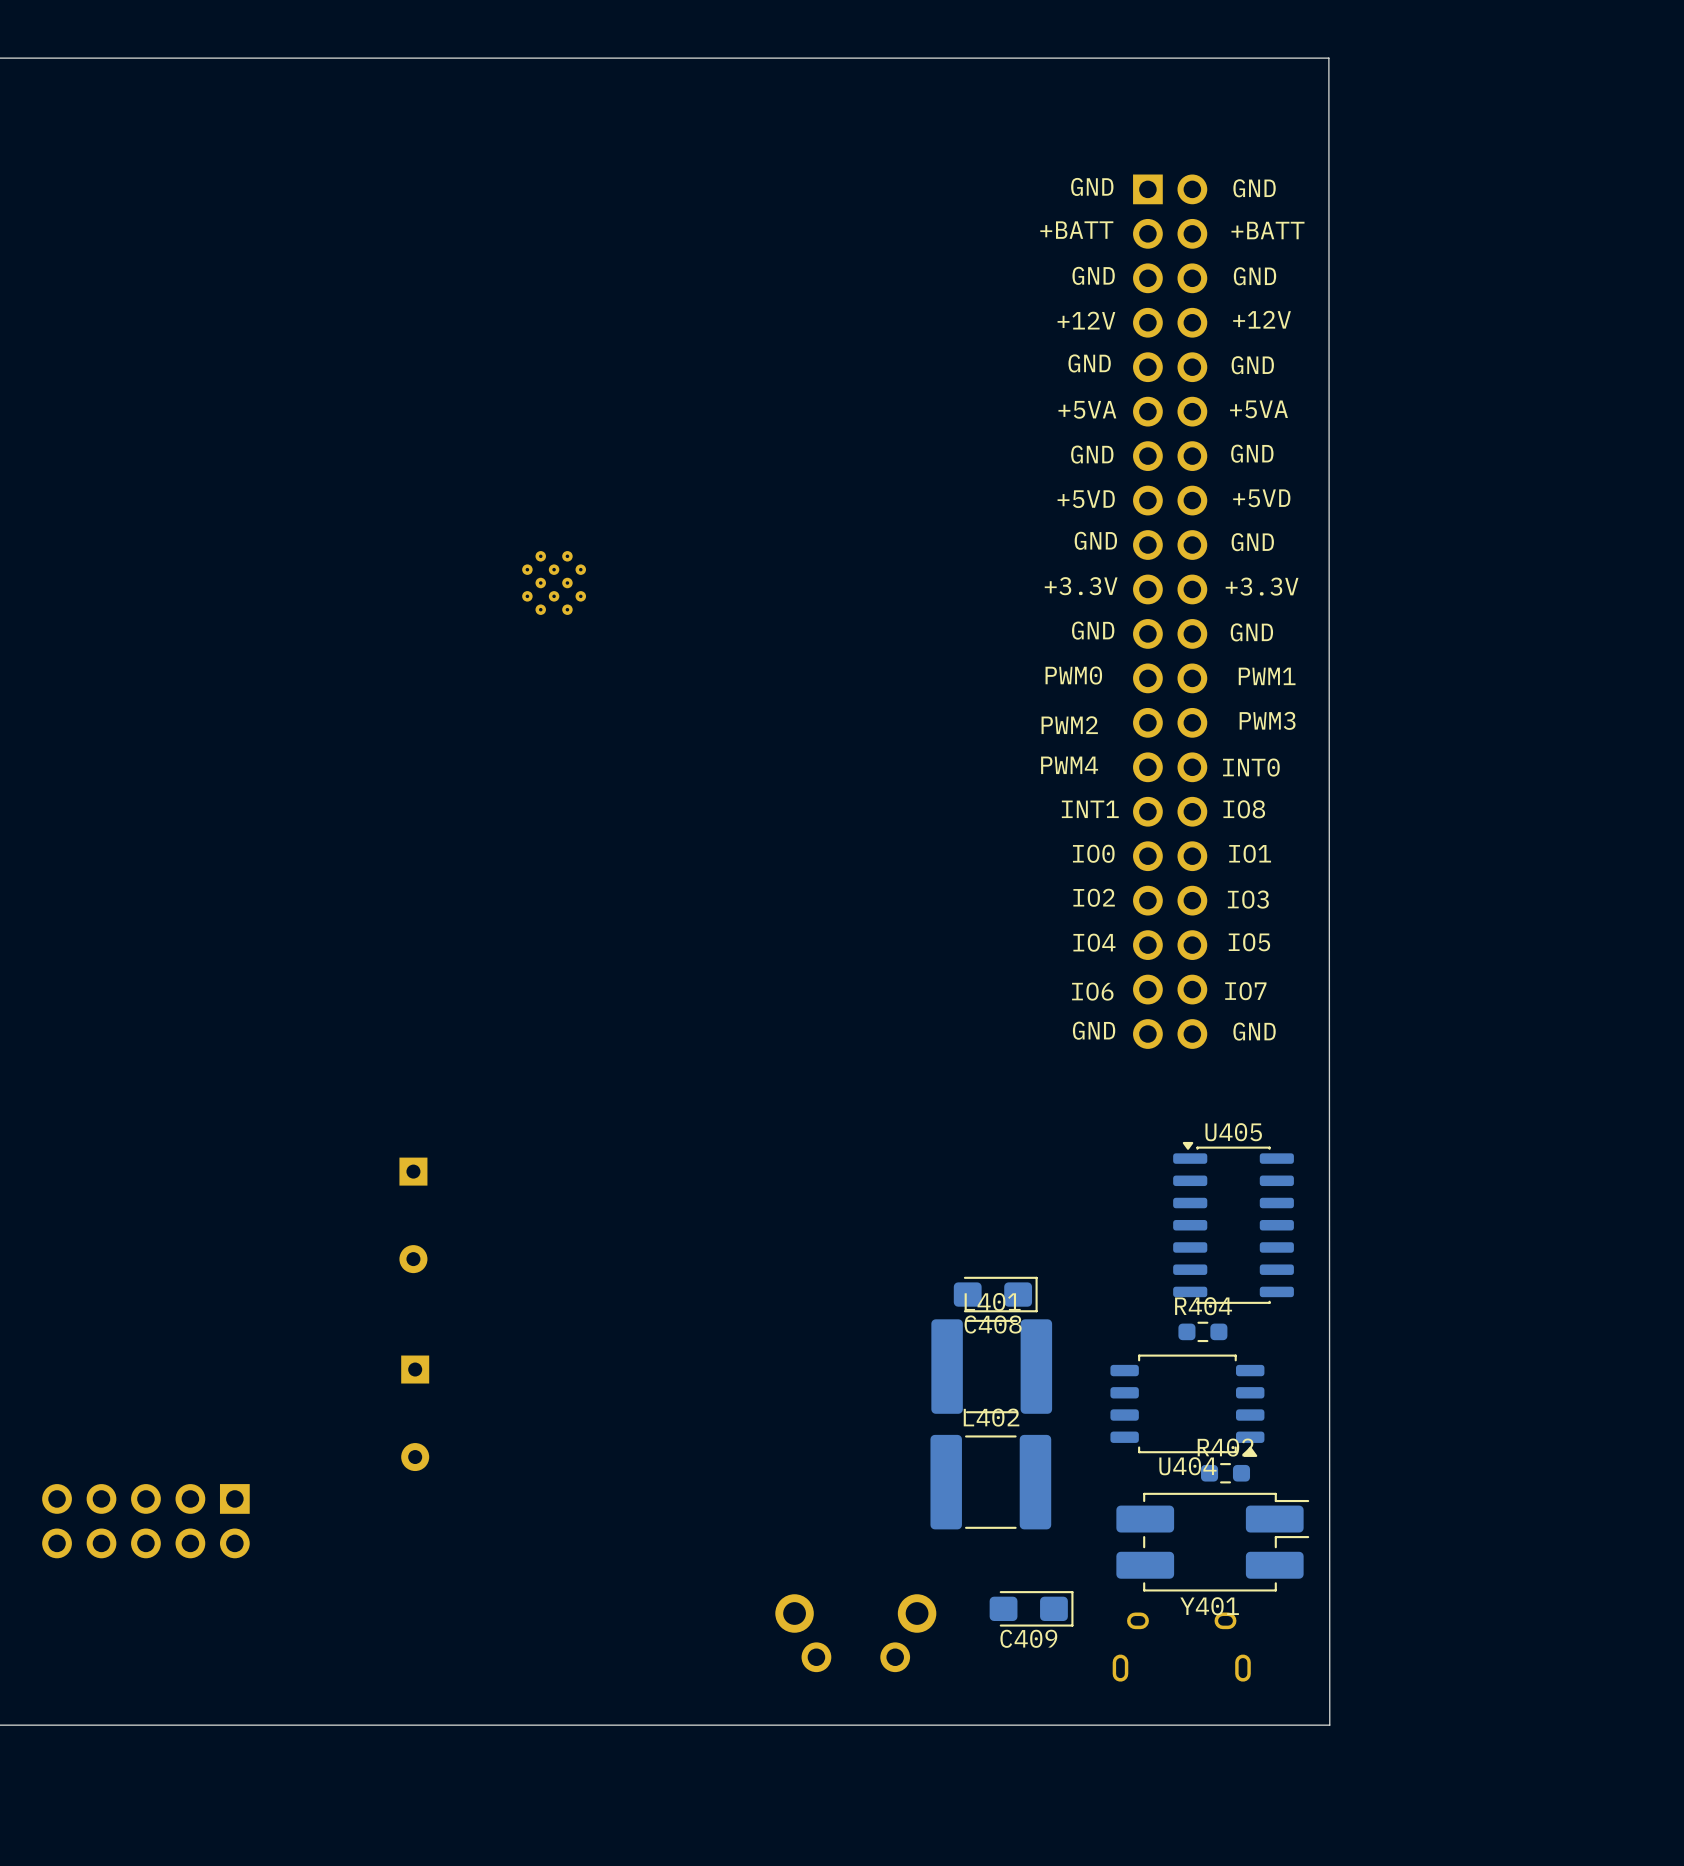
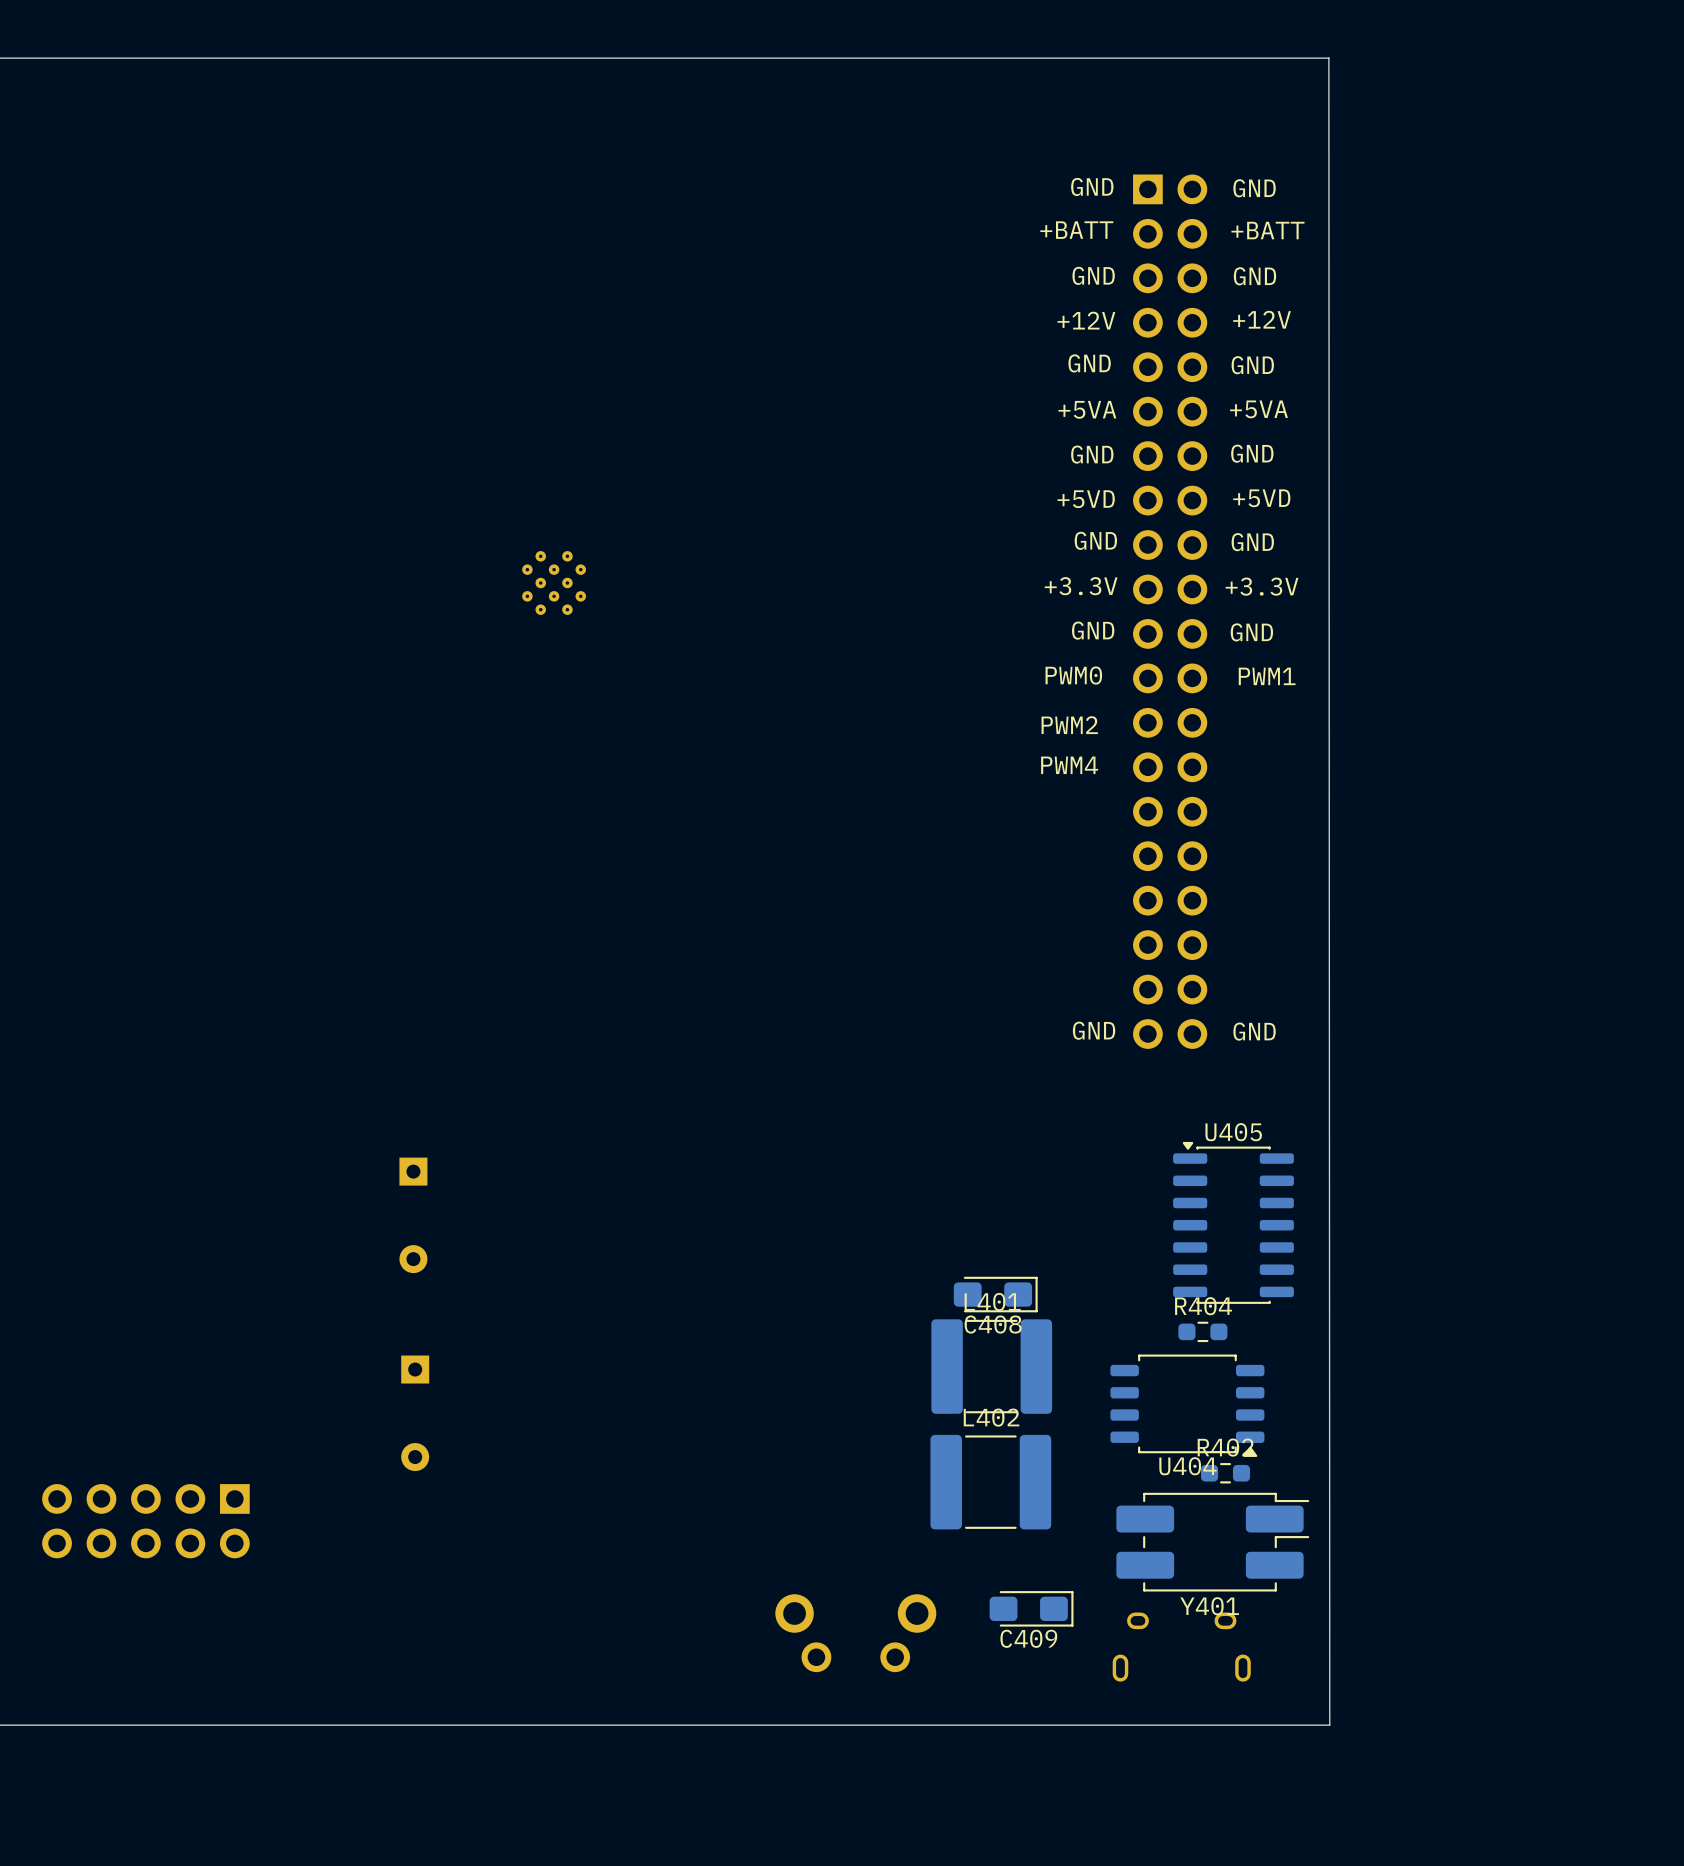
text: PWM3 (1267, 720) -> none
text: INT0 (1251, 767) -> none
text: INT1 (1090, 809) -> none
text: IO8 (1244, 809) -> none
text: IO0 (1093, 853) -> none
text: IO1 (1250, 853) -> none
text: IO2 (1094, 897) -> none
text: IO3 (1248, 899) -> none
text: IO4 (1094, 942) -> none
text: IO5 (1249, 942) -> none
text: IO6 (1092, 991) -> none
text: IO7 (1245, 991) -> none

